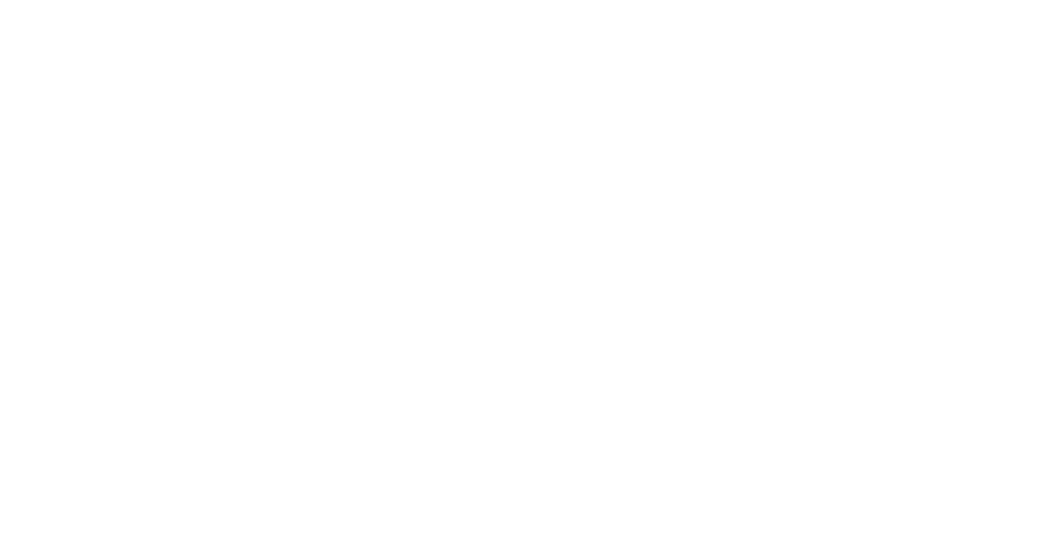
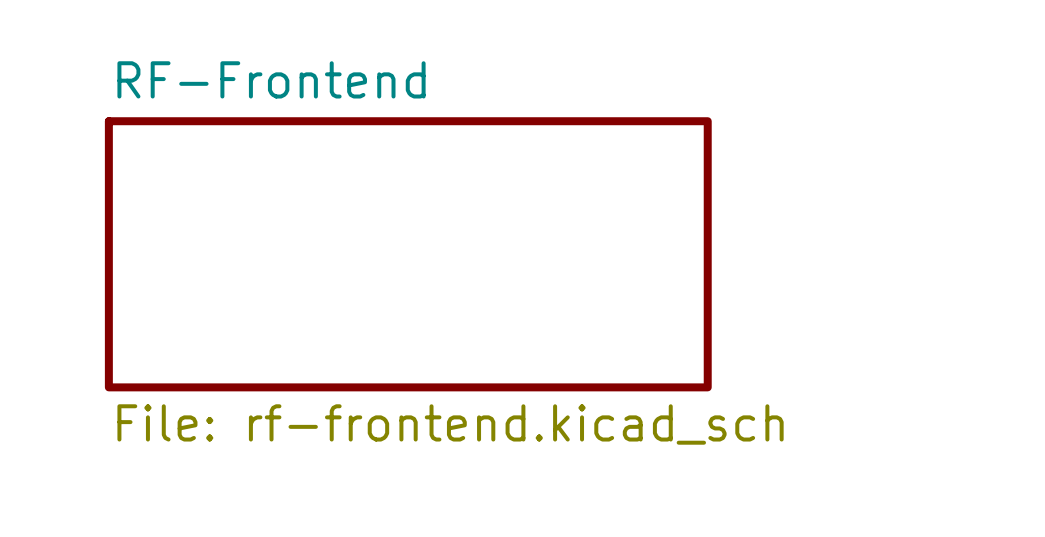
sheet RF-Frontend: none -> File: rf-frontend.kicad_sch (408, 254)

